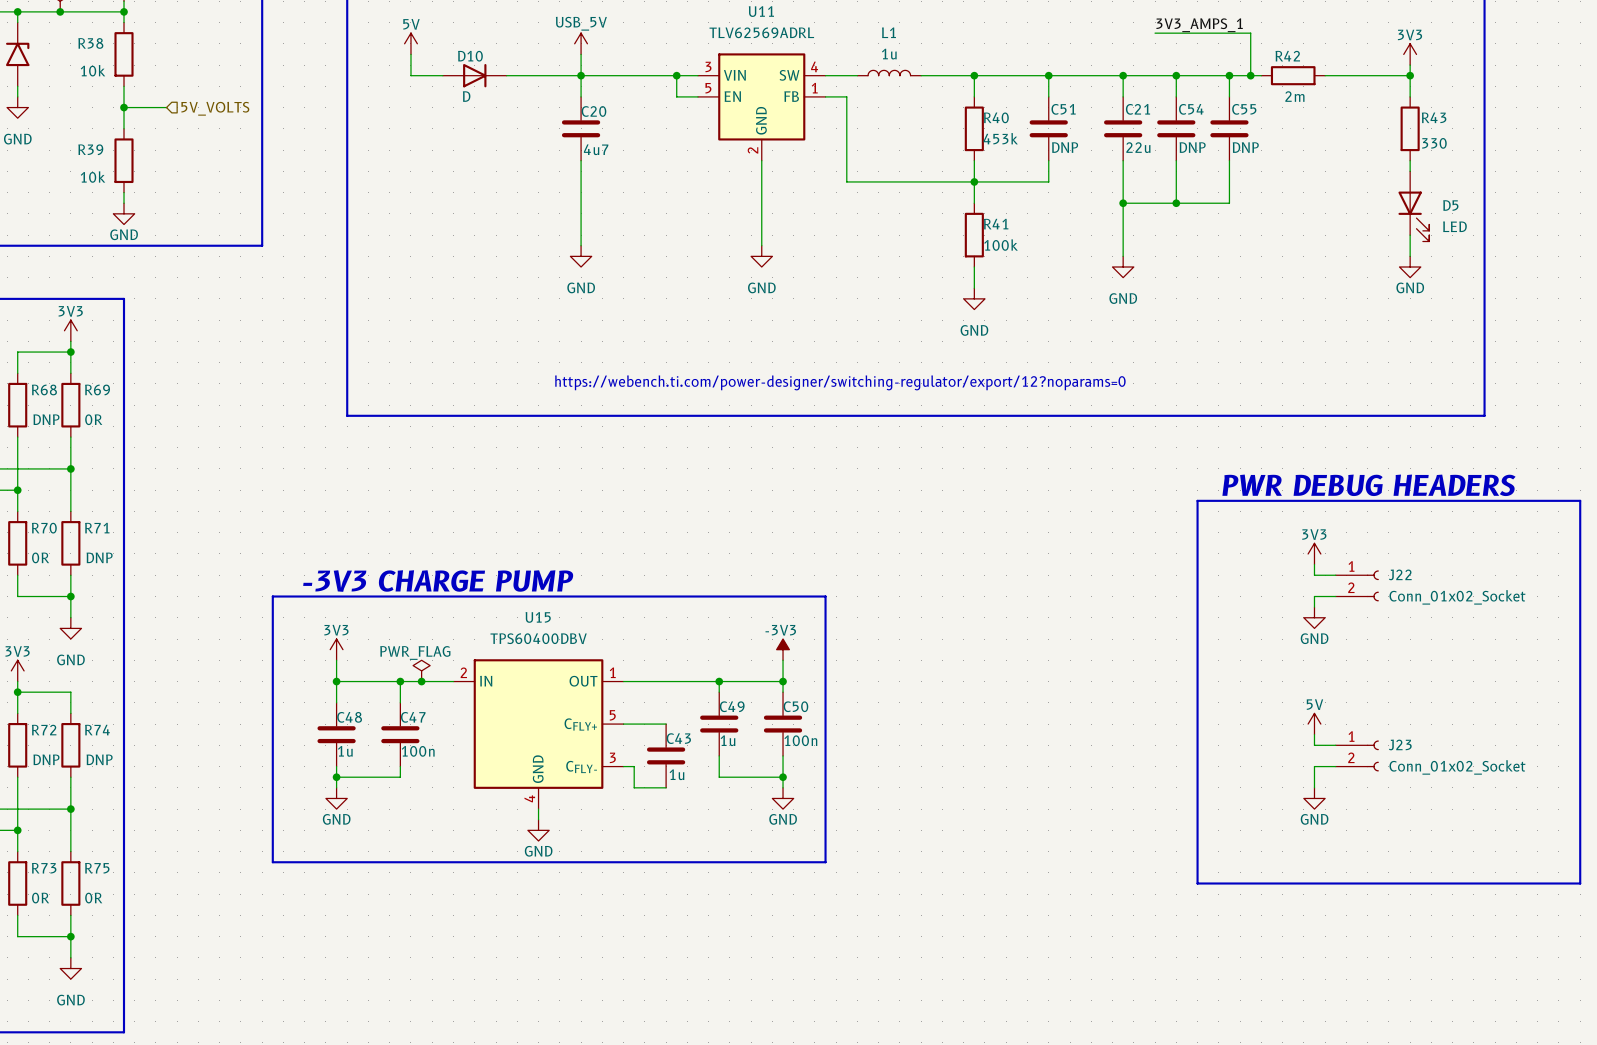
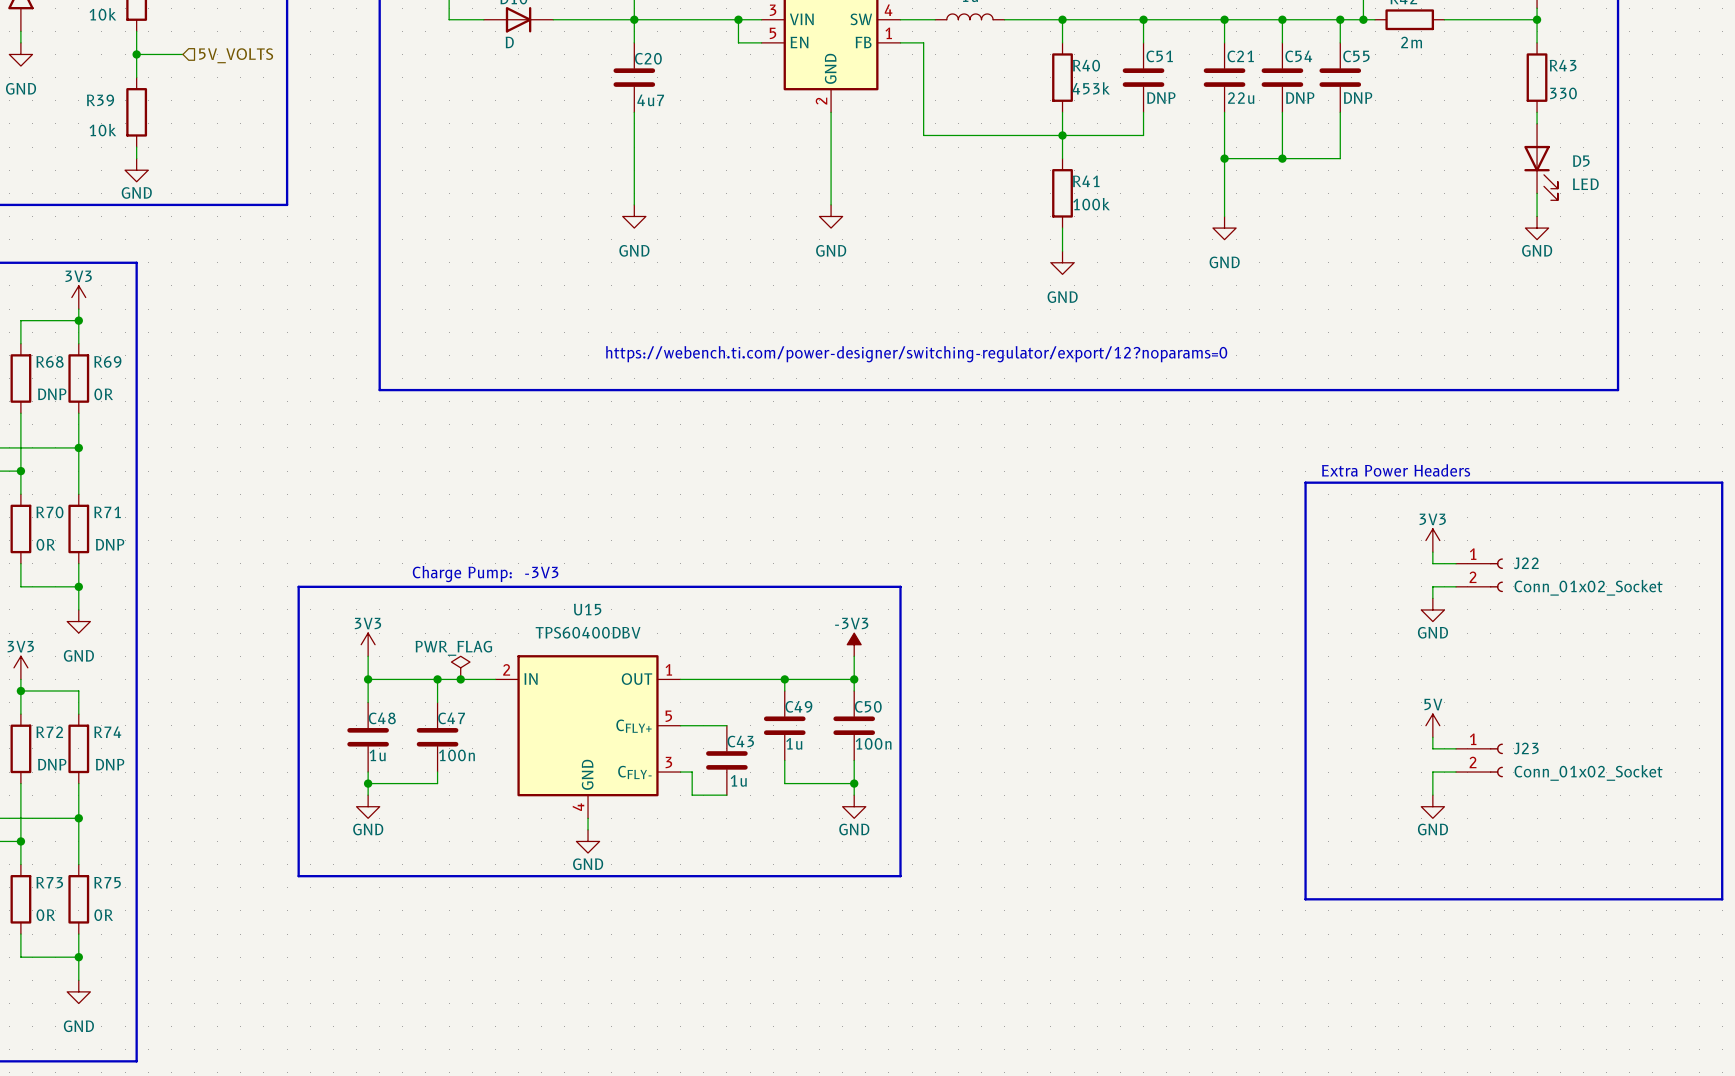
text: PWR DEBUG HEADERS (1368, 485) -> none
text: none -> Extra Power Headers (1396, 470)
text: -3V3 CHARGE PUMP (438, 581) -> none
text: none -> Charge Pump: -3V3 (485, 574)

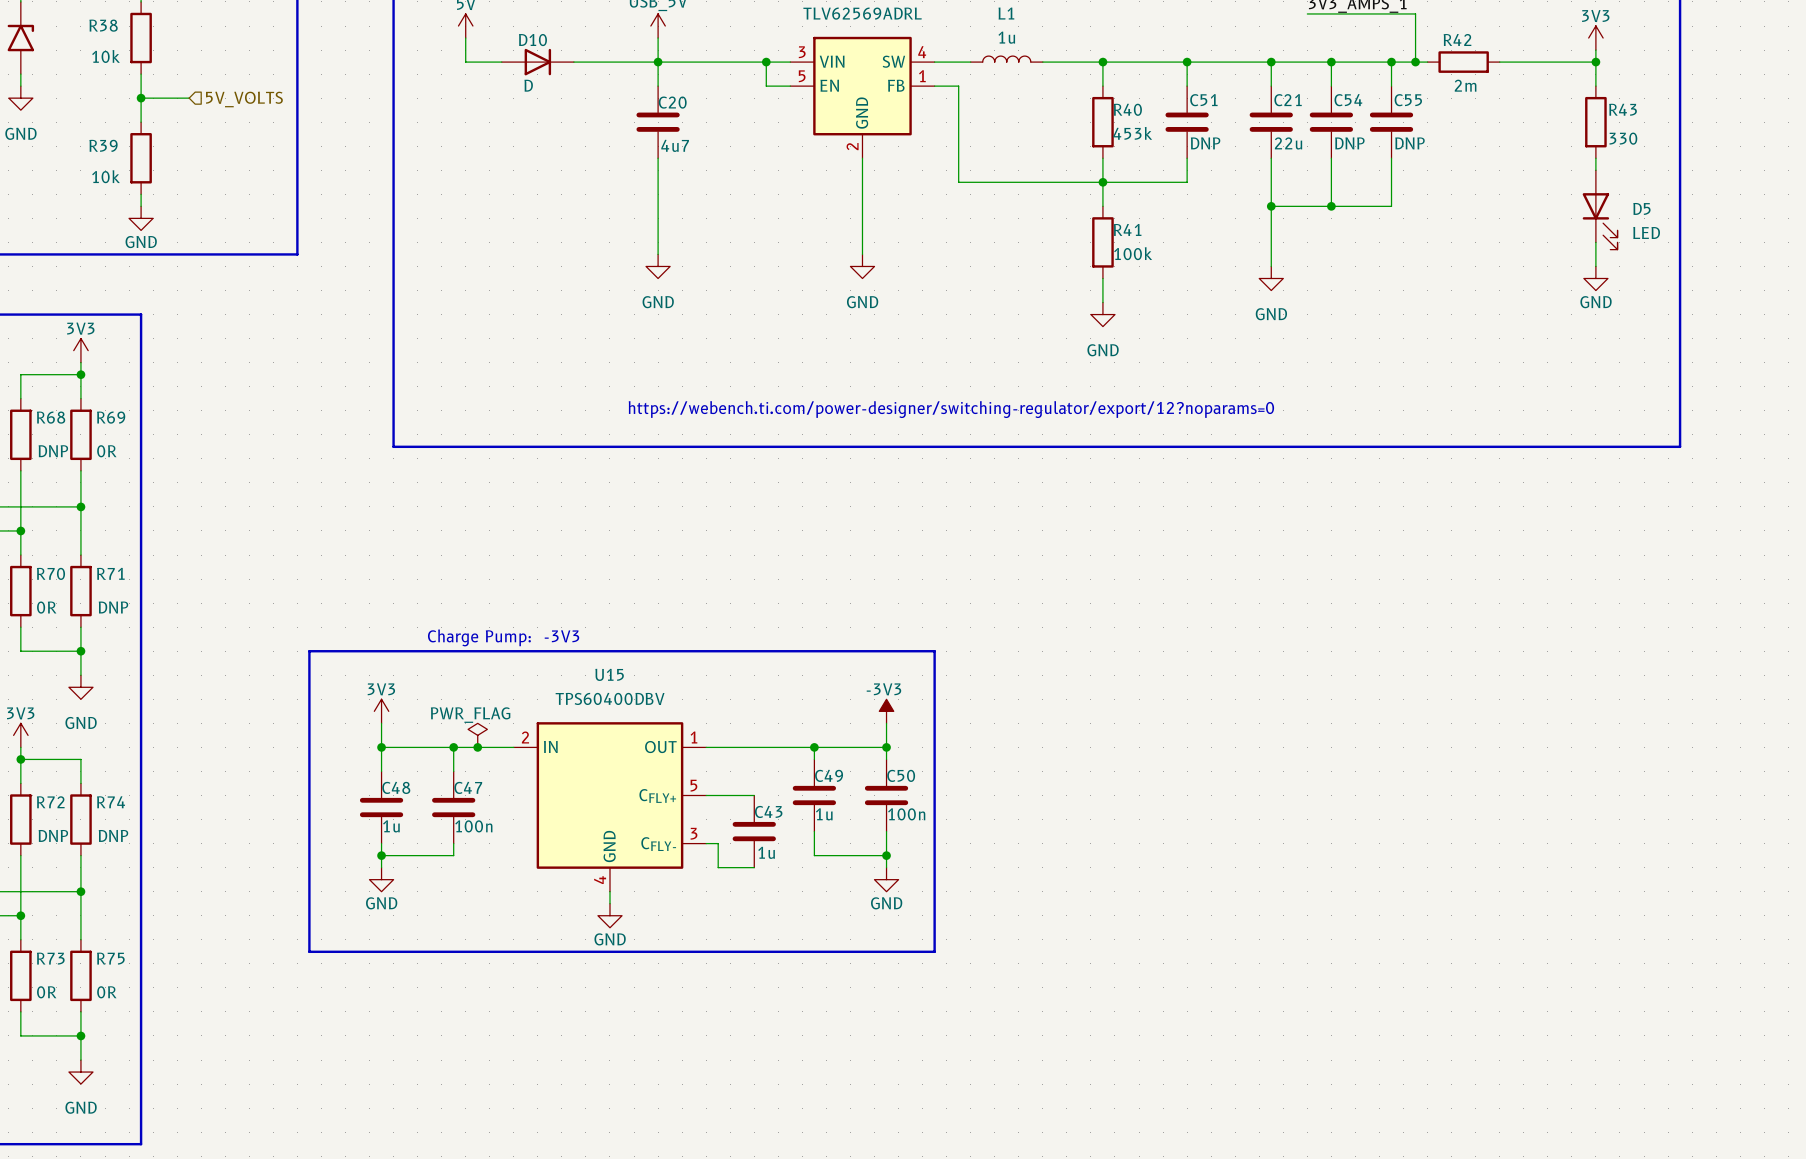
text: Extra Power Headers (1396, 470) -> none
line: (1305, 482) (1722, 482) (1722, 899) (1305, 899) (1305, 482) -> none
power symbol: 3V3 (1432, 540) -> none
wire: (1432, 552) (1432, 563) (1456, 563) -> none
J22: Conn_01x02_Socket (1479, 575) -> none
wire: (1456, 586) (1432, 586) (1432, 598) -> none
power symbol: GND (1432, 609) -> none
power symbol: 5V (1432, 725) -> none
wire: (1432, 737) (1432, 748) (1456, 748) -> none
J23: Conn_01x02_Socket (1479, 760) -> none
wire: (1456, 772) (1432, 772) (1432, 795) -> none
power symbol: GND (1432, 806) -> none

